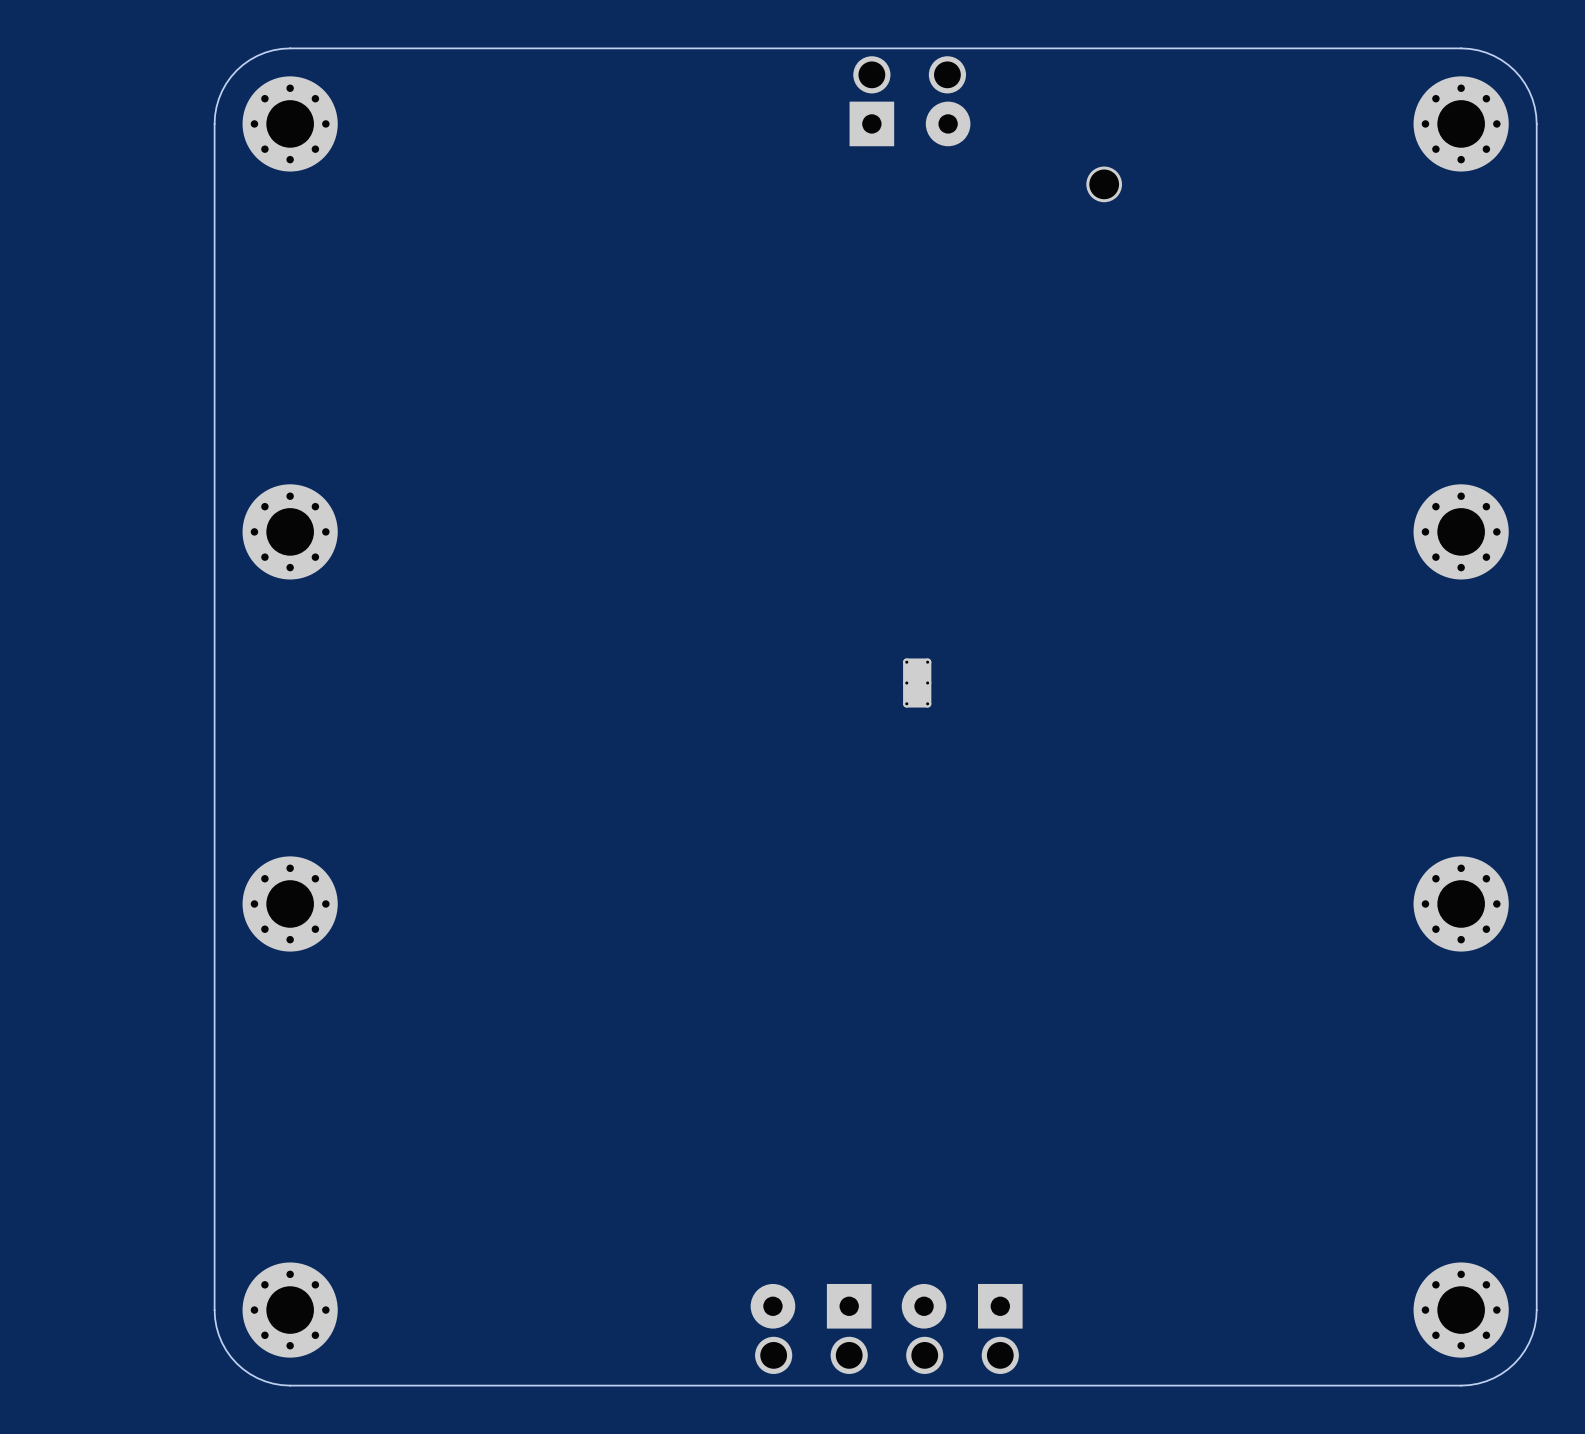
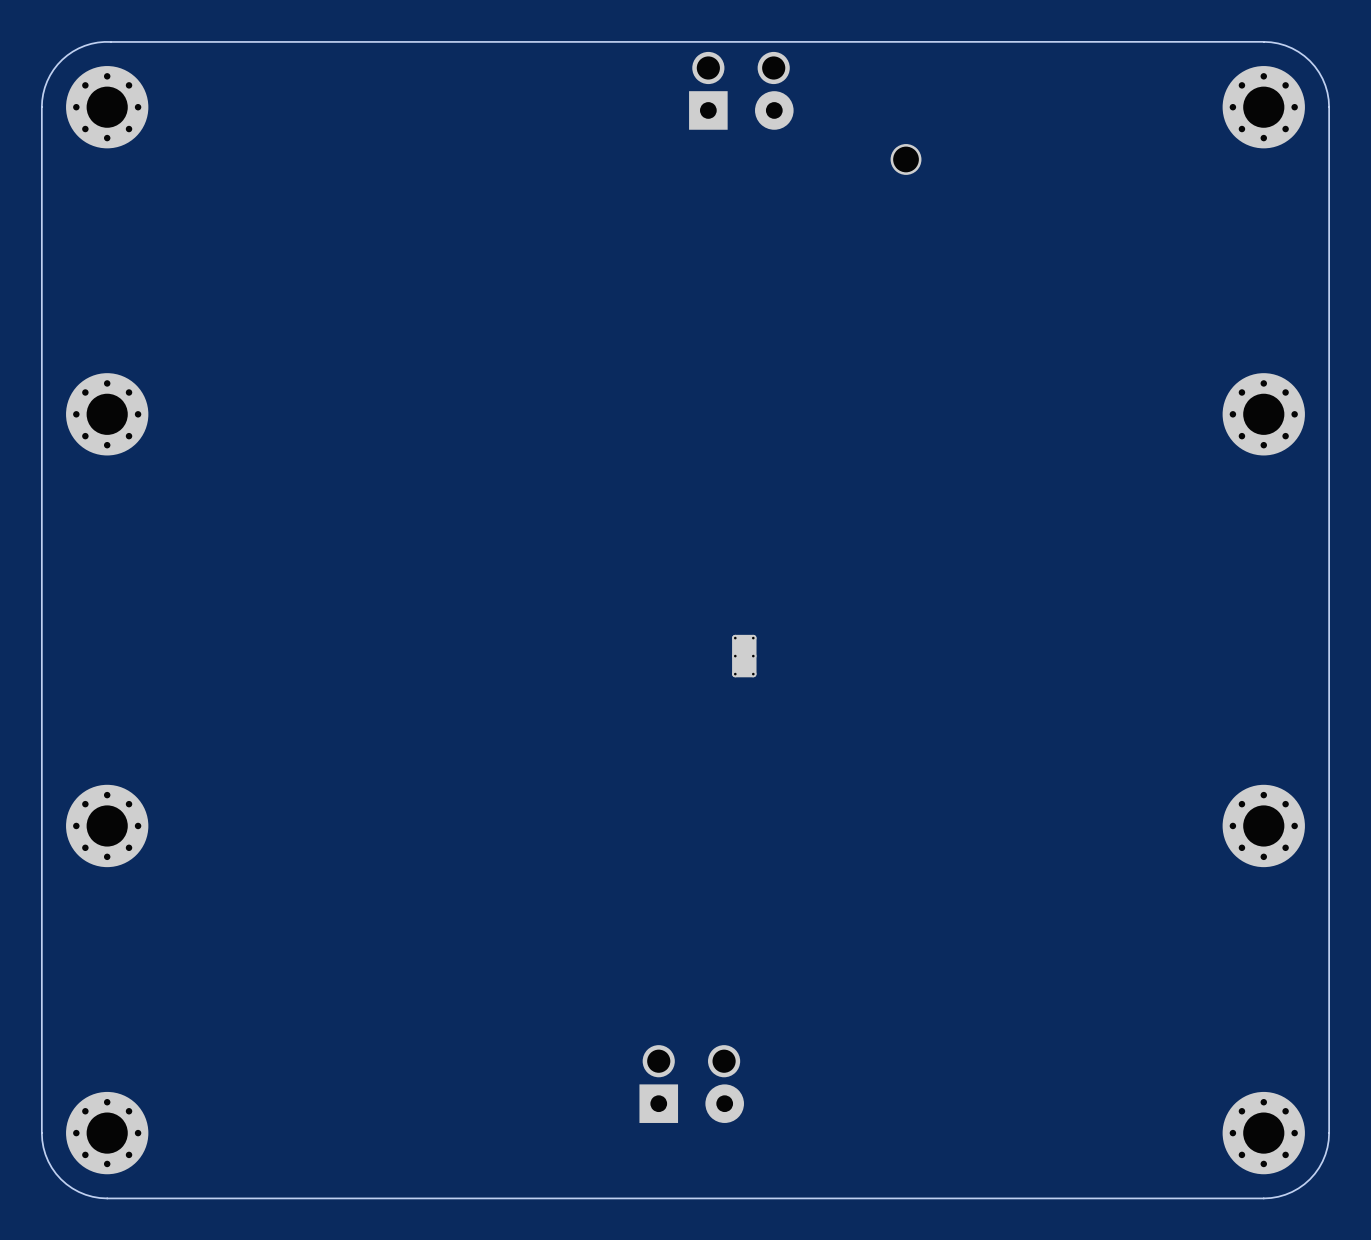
board edge: (1461, 48) (290, 48) (273, 50) (257, 55) (243, 64) (231, 76) (218, 98) (214, 123) (214, 1310) (216, 1326) (222, 1342) (236, 1363) (257, 1378) (273, 1383) (290, 1385) -> (1263, 41) (104, 41) (78, 48) (57, 64) (44, 87) (41, 107) (41, 1133) (43, 1147) (48, 1161) (60, 1179) (78, 1191) (92, 1196) (250, 1198)
part position: (909, 101) -> (741, 90)
part position: (290, 123) -> (107, 107)
part position: (1104, 184) -> (906, 159)
part position: (290, 531) -> (107, 414)
part position: (1461, 531) -> (1263, 414)
part position: (917, 683) -> (744, 656)
part position: (290, 903) -> (107, 825)
part position: (1461, 903) -> (1263, 825)
part position: (290, 1310) -> (107, 1133)
part rotation: 0° (811, 1328) -> 180° (691, 1084)
part position: (811, 1328) -> (691, 1084)
part: (962, 1328) -> none

